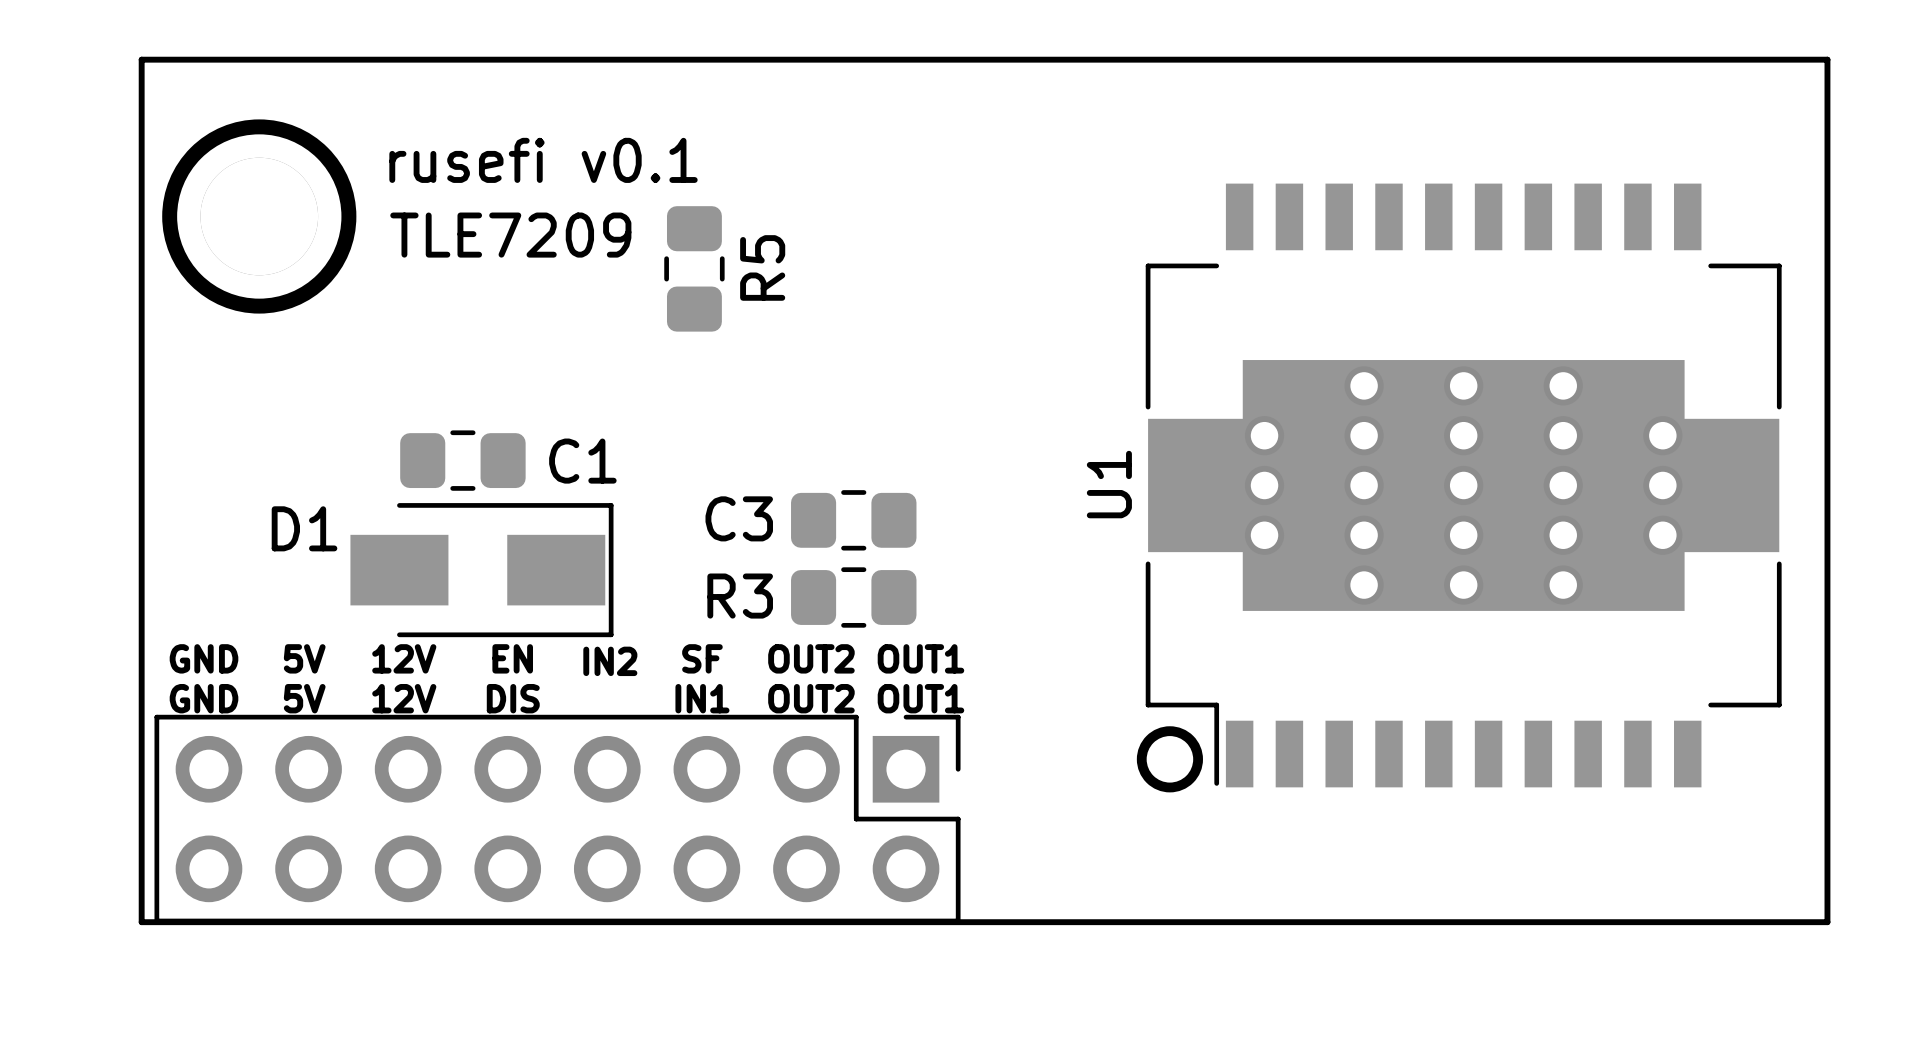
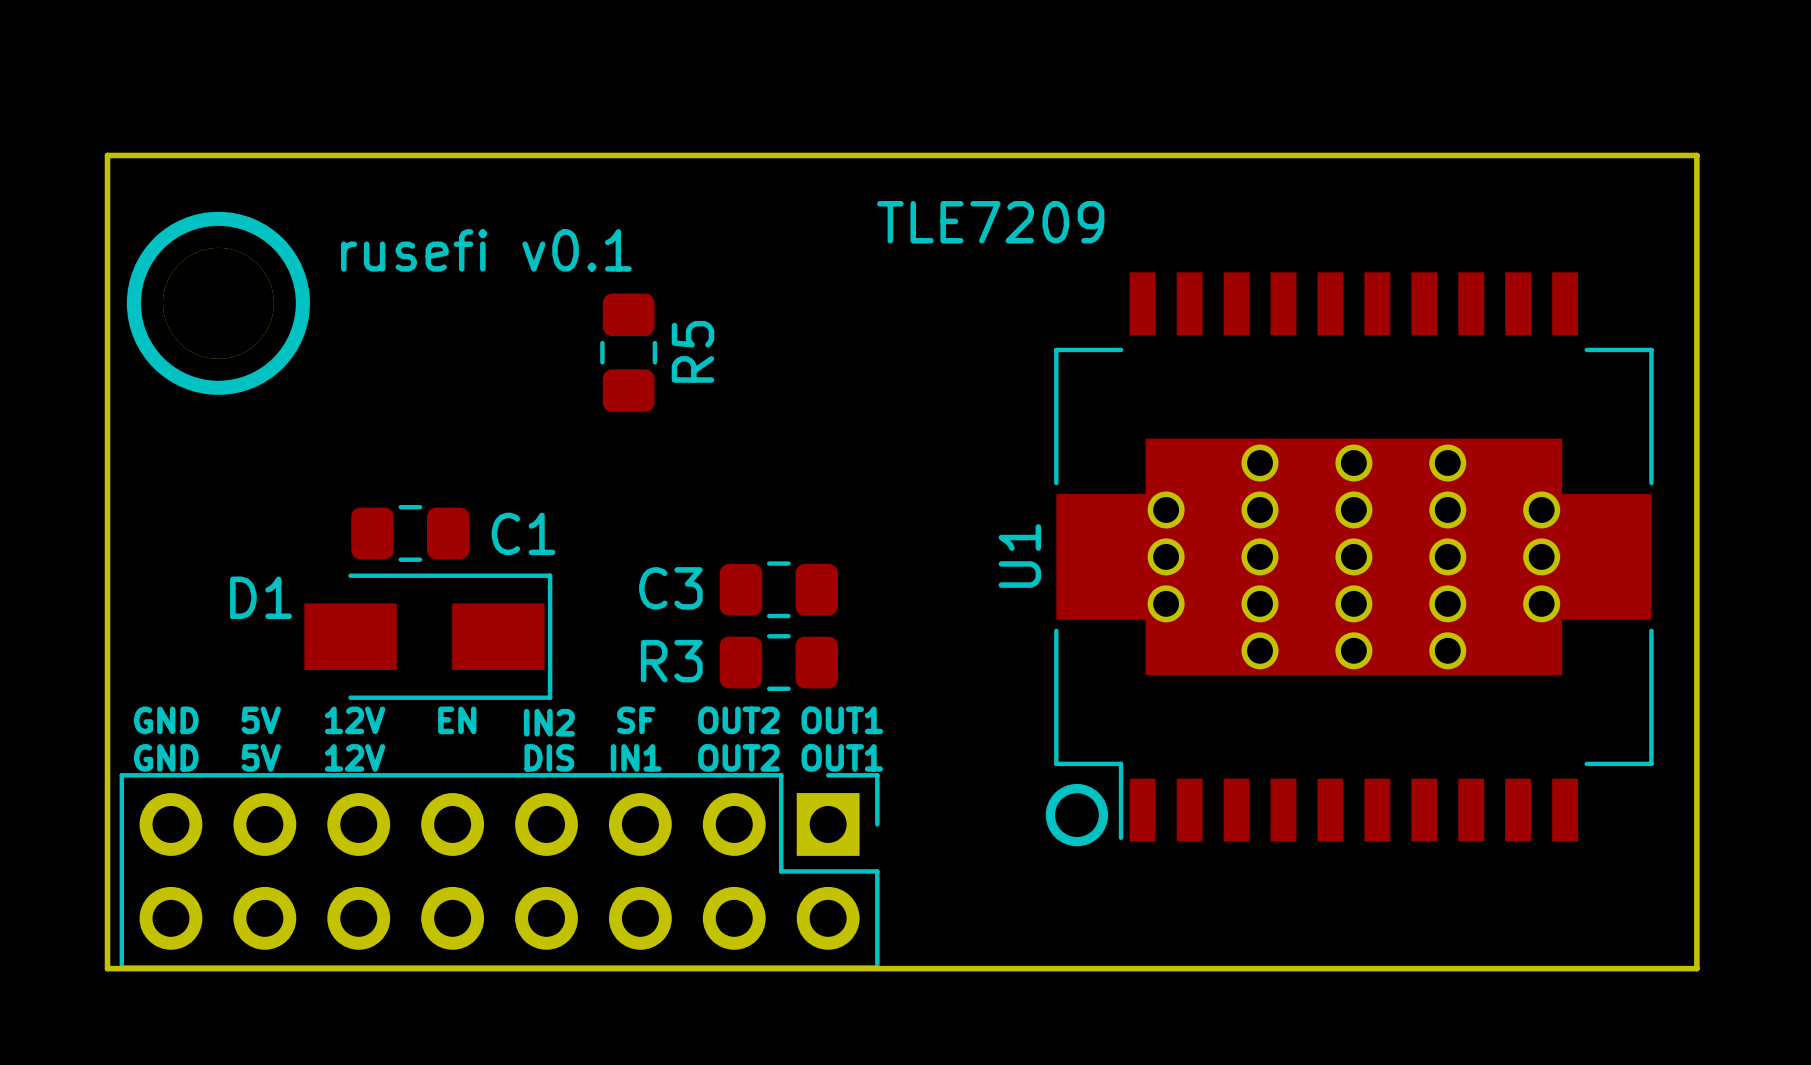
text position: TLE7209 (510, 235) -> TLE7209 (990, 222)
text position: DIS (513, 698) -> DIS (549, 757)

